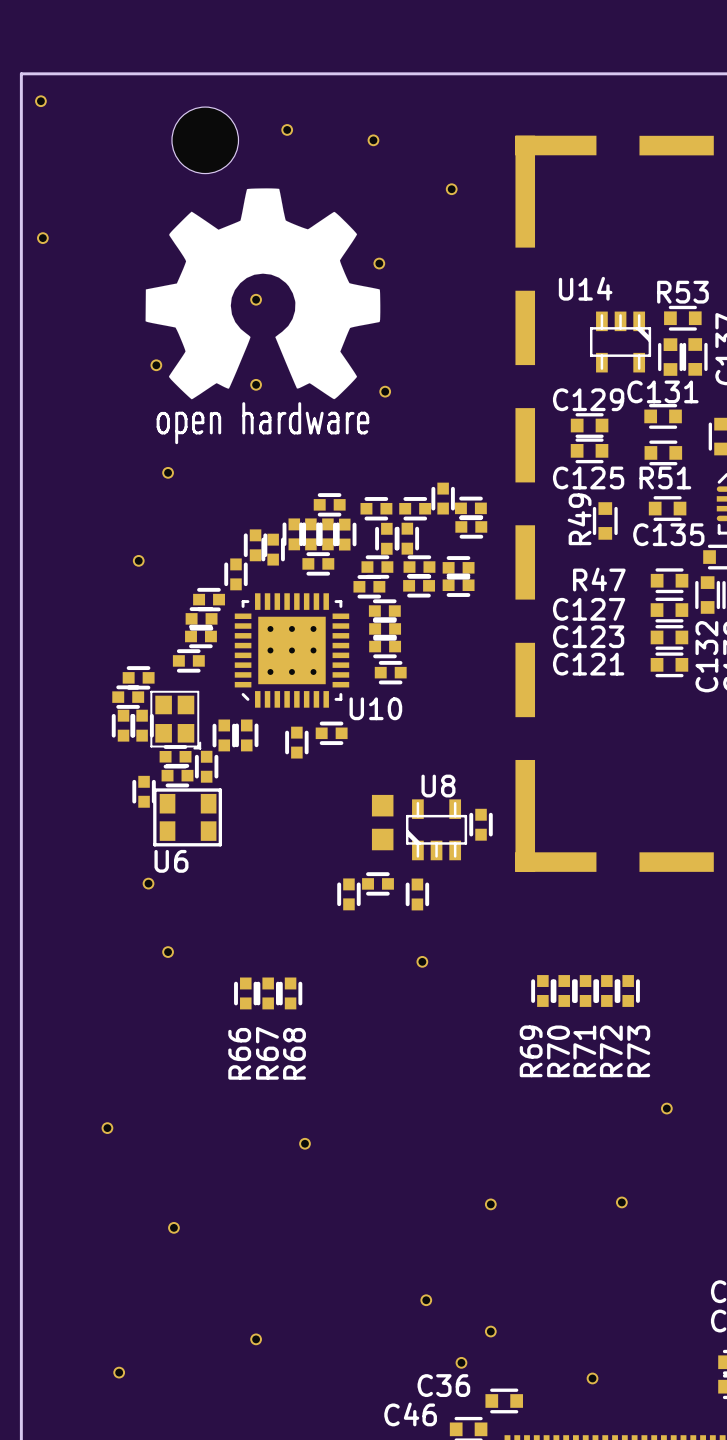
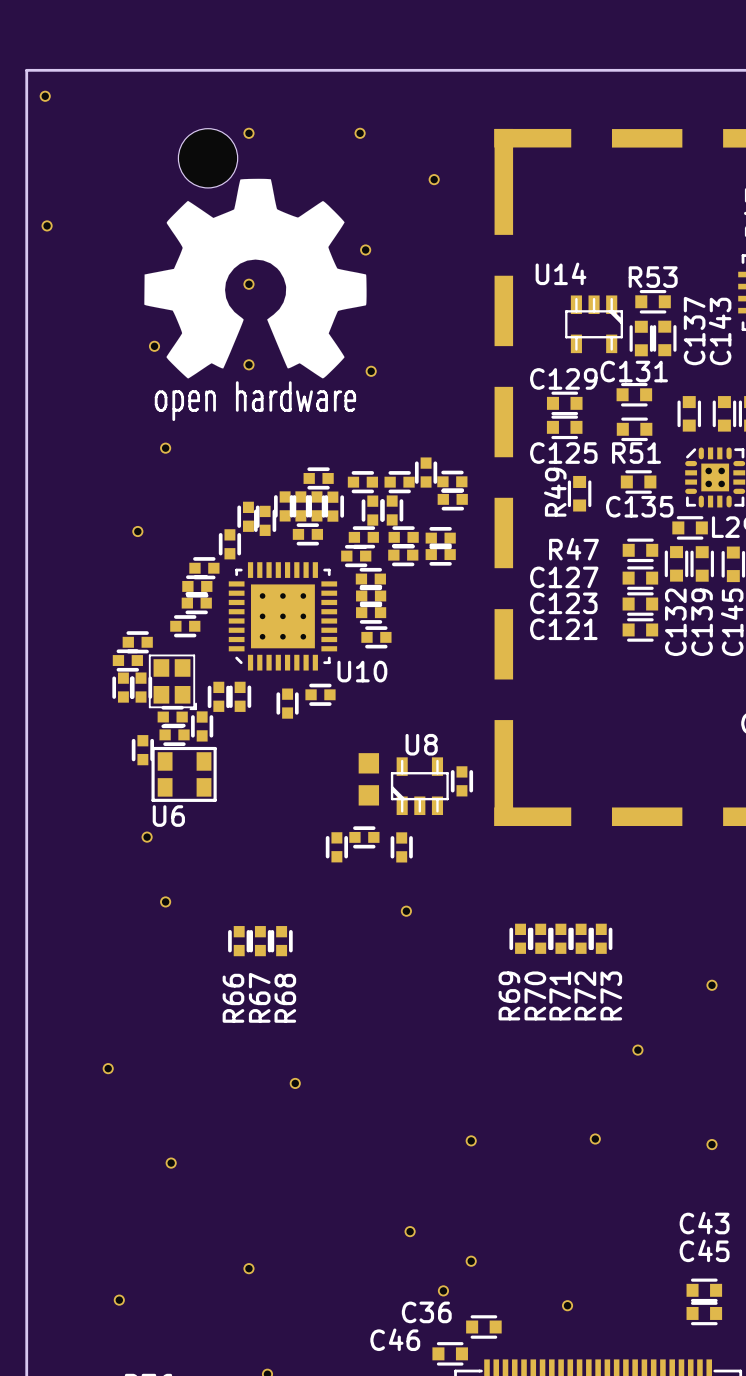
part position: (287, 129) -> (248, 133)
part: (205, 140) -> none
part: none -> (208, 158)

